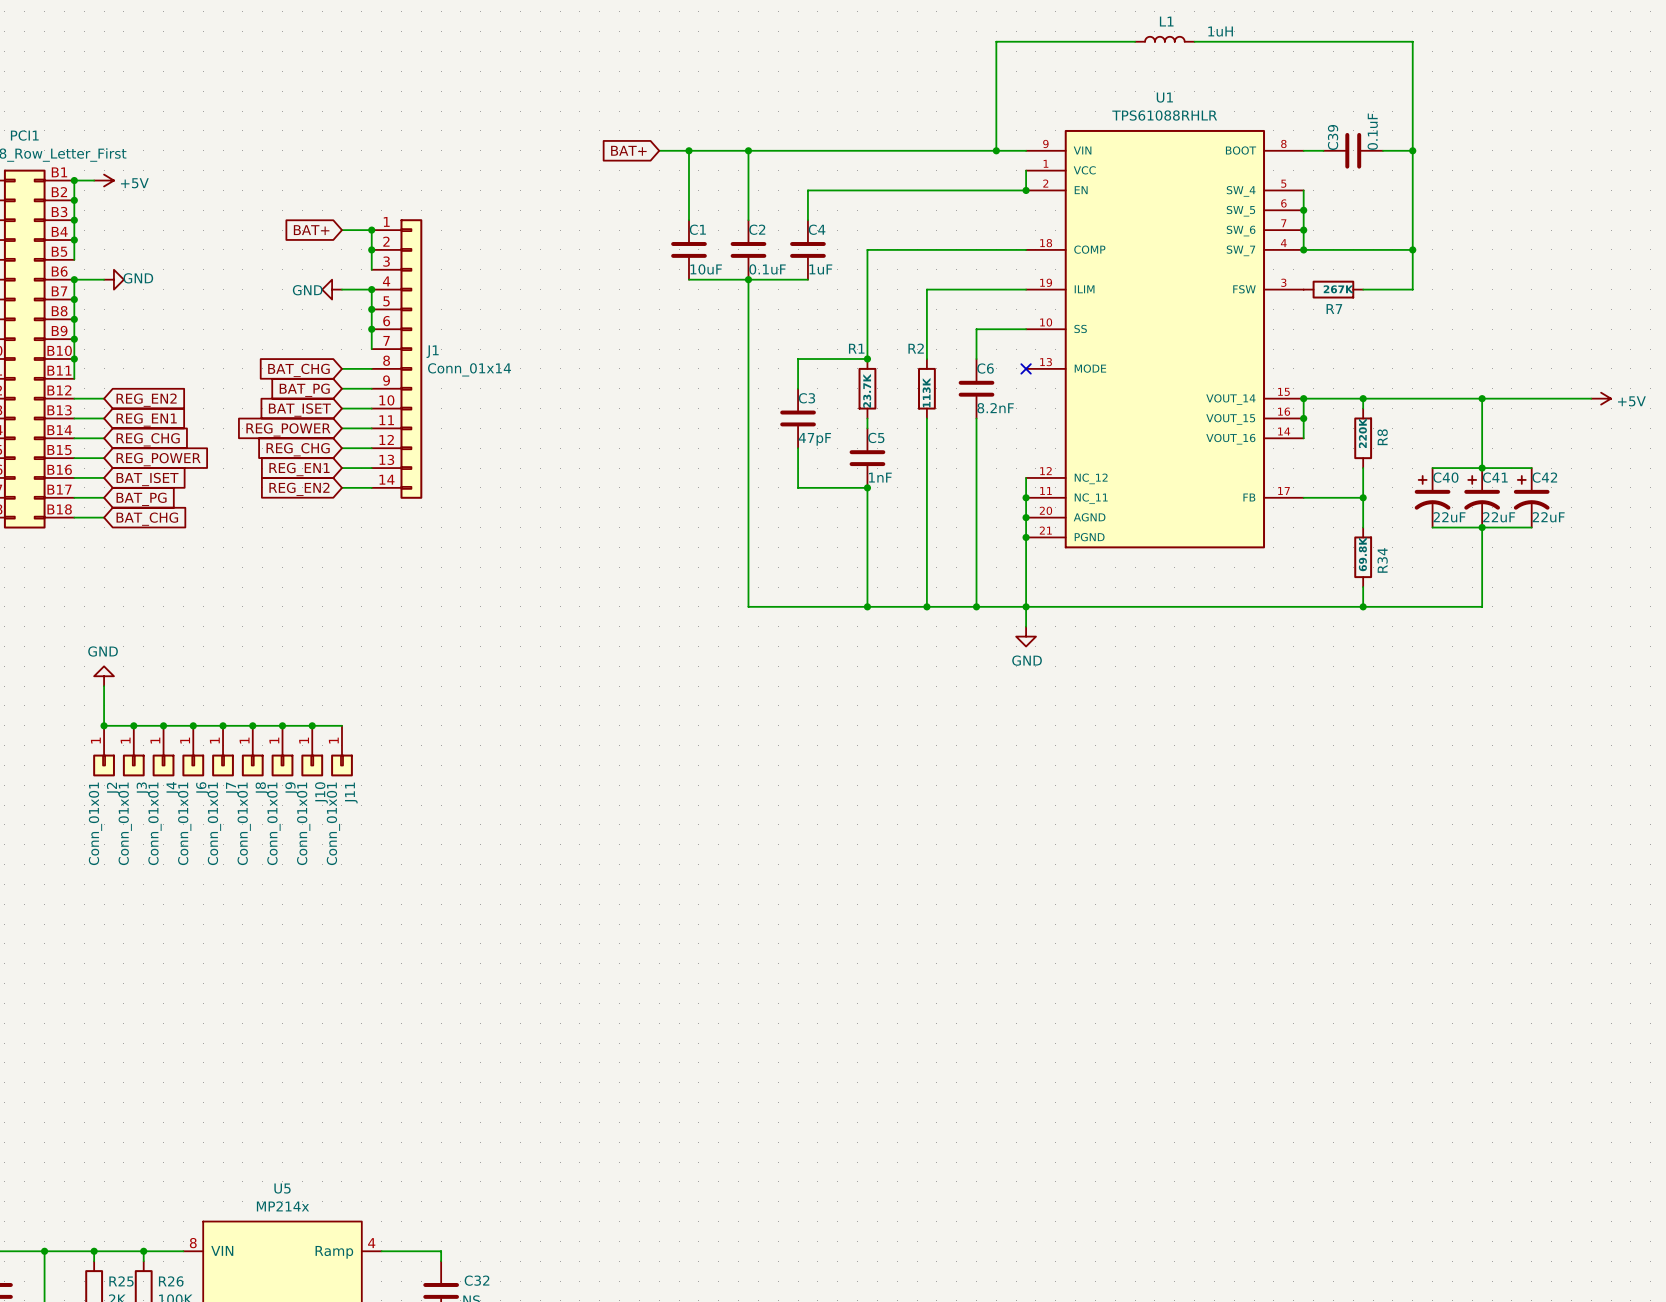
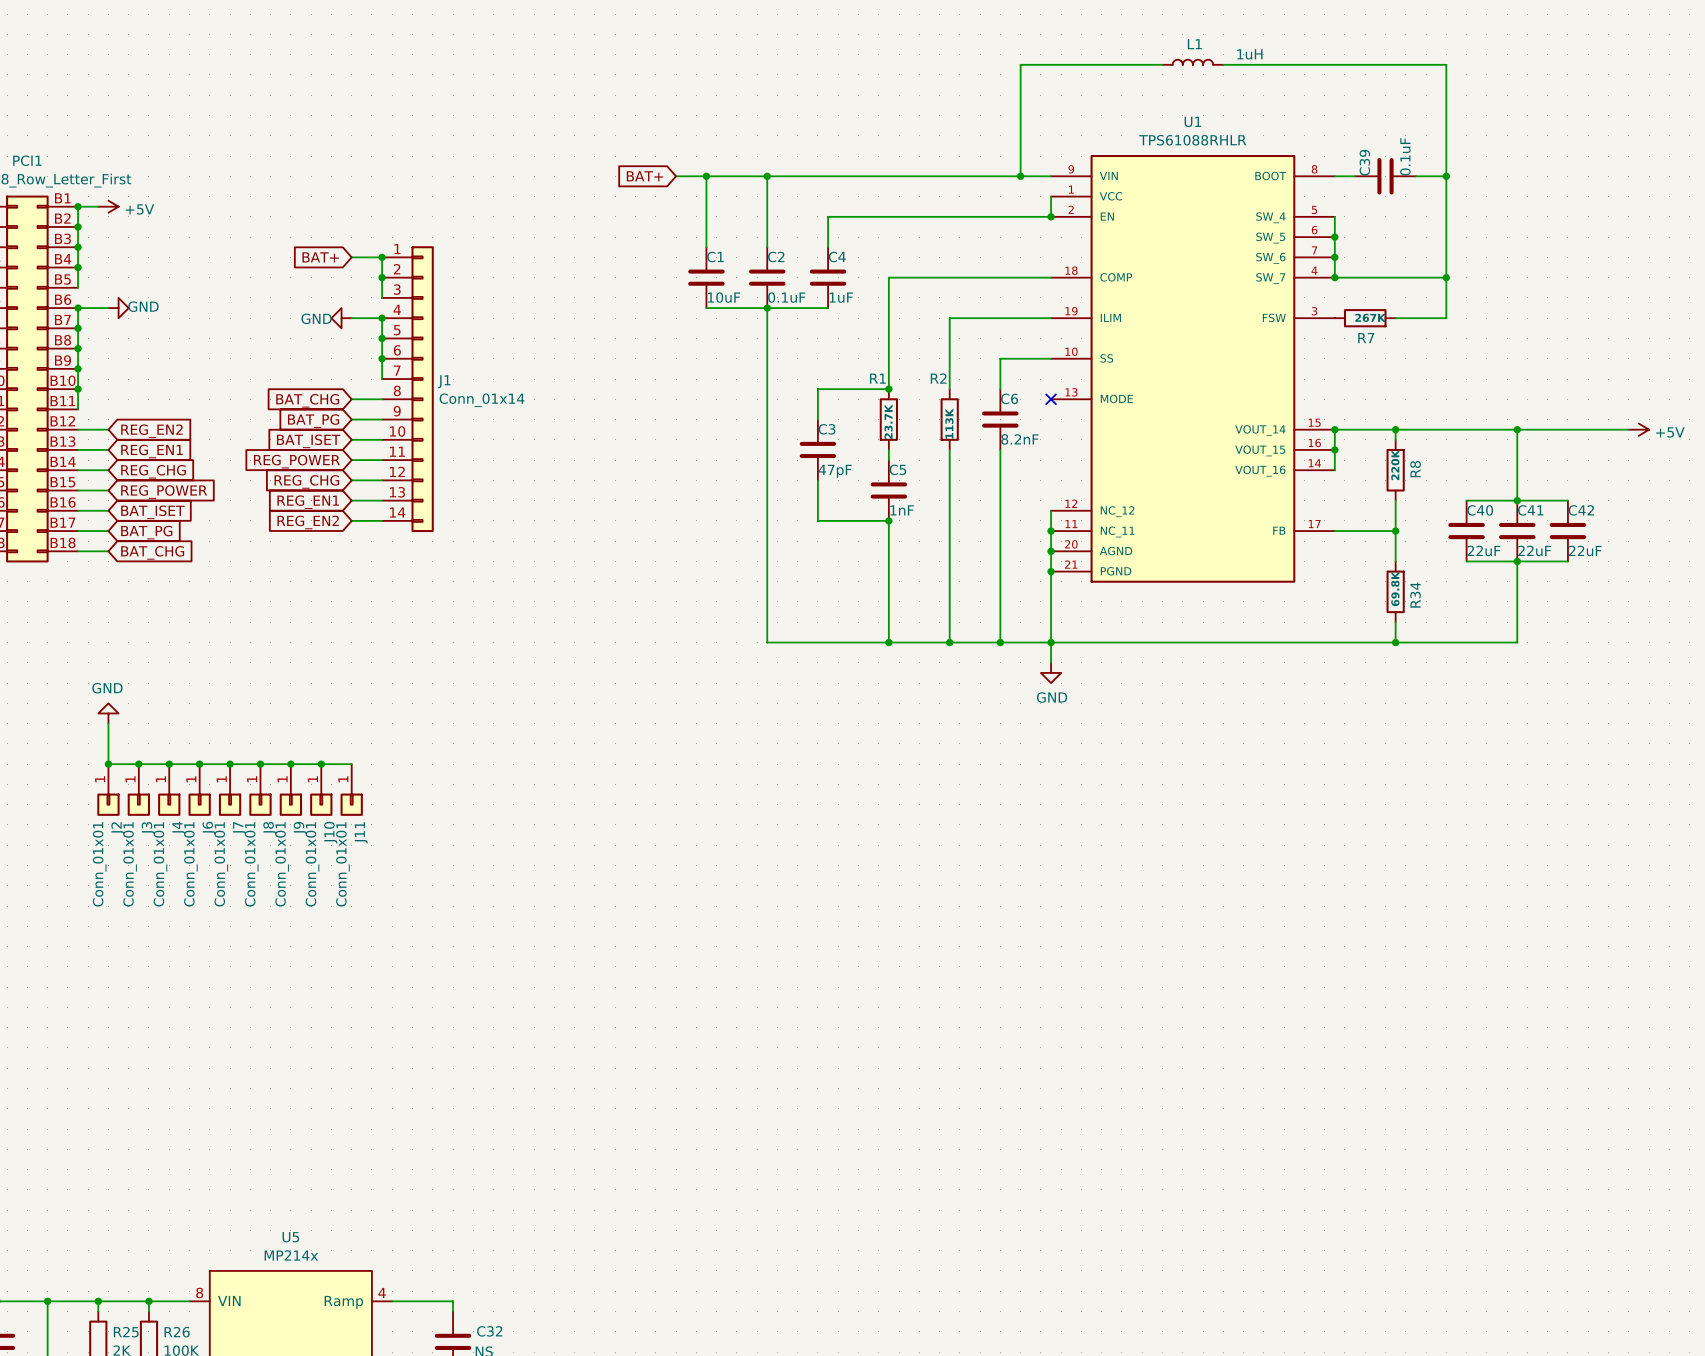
C40 symbol: [1414, 468, 1451, 528] -> [1448, 500, 1485, 562]
C41 symbol: [1464, 468, 1500, 528] -> [1499, 500, 1536, 562]
C42 symbol: [1513, 468, 1550, 528] -> [1549, 500, 1587, 562]

